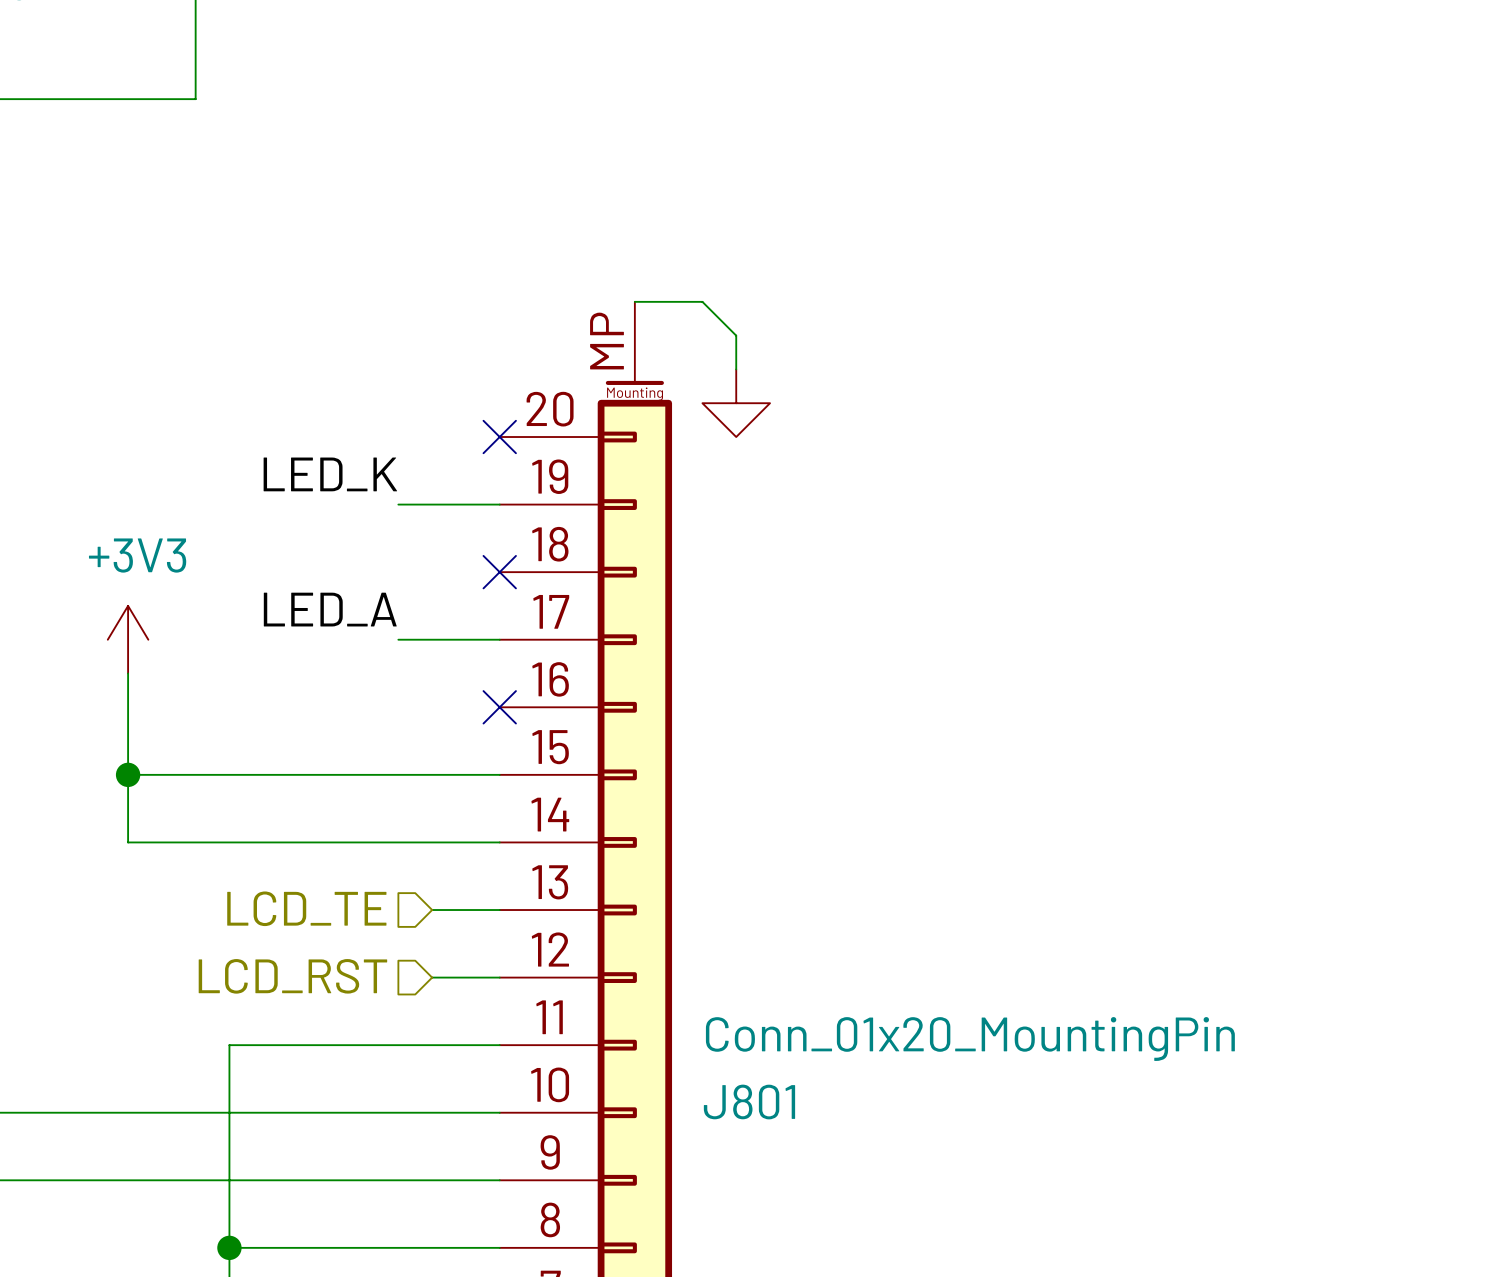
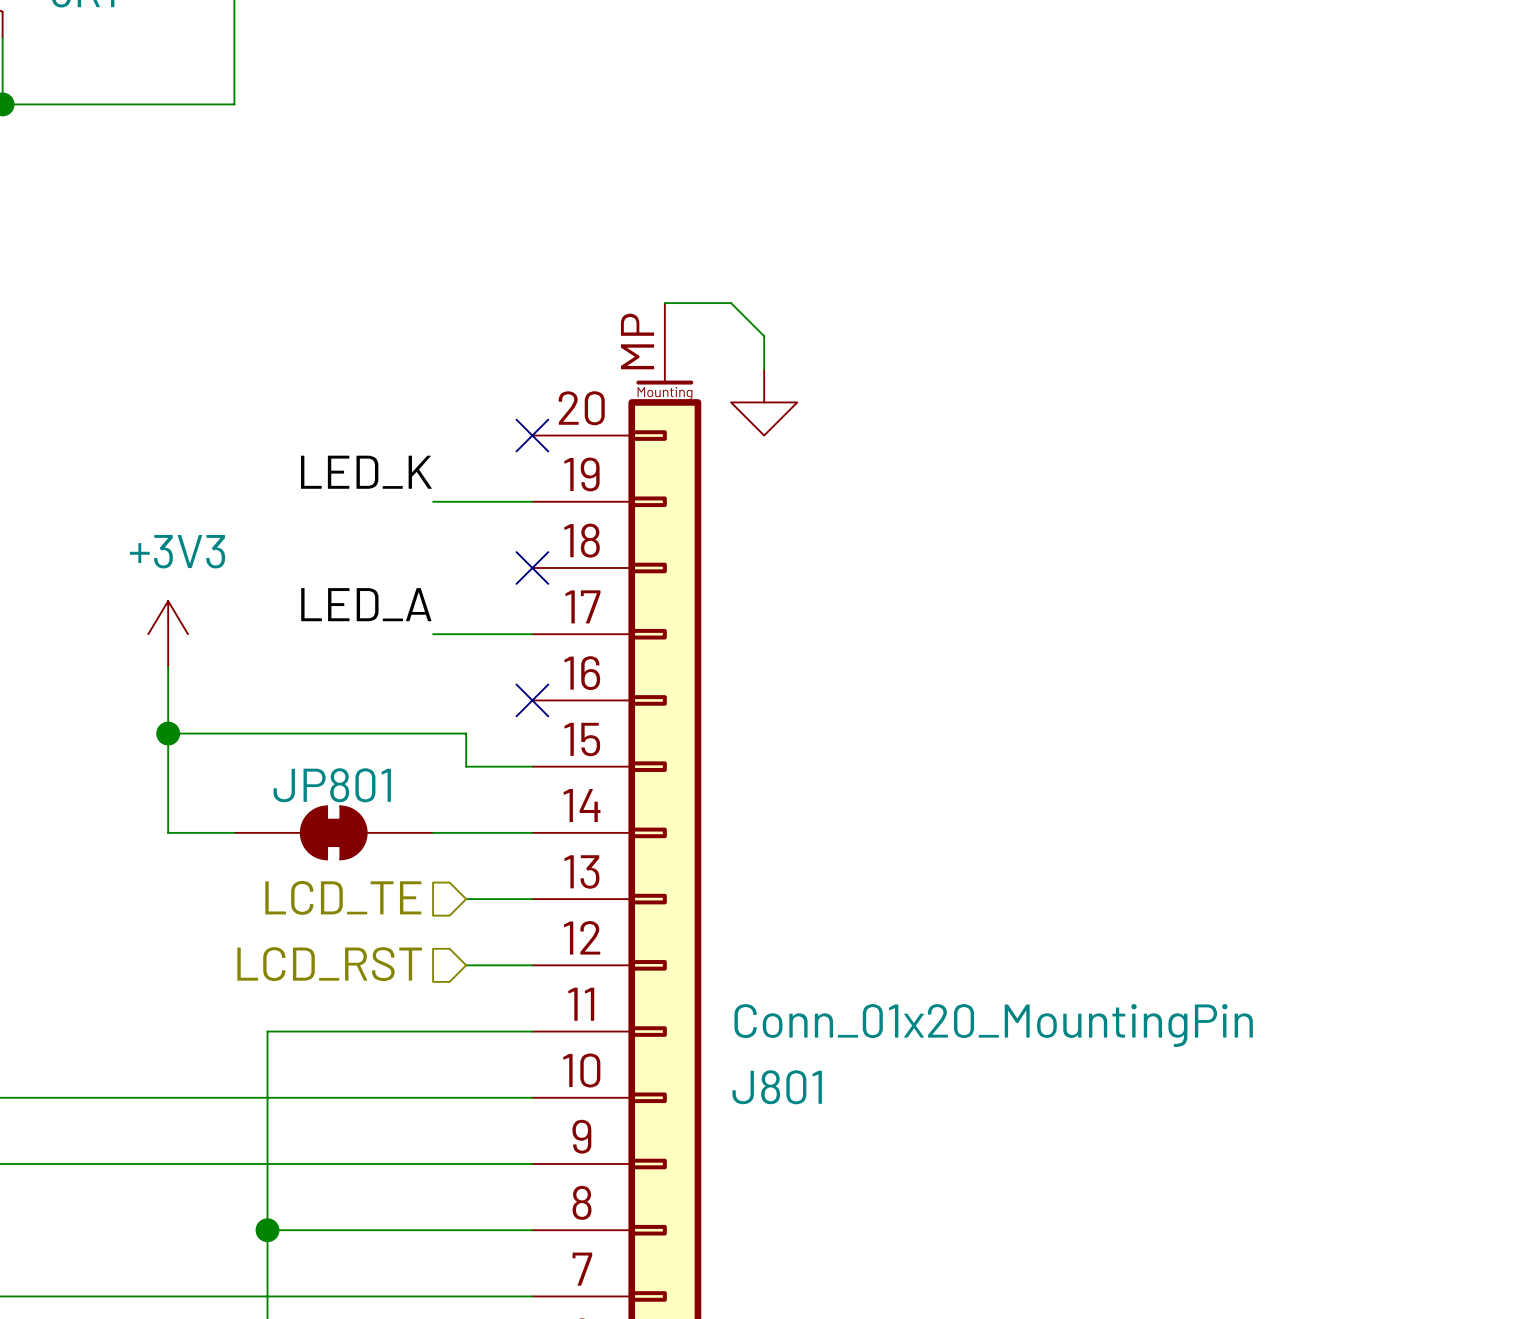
wire: (128, 774) (432, 774) -> (168, 733) (466, 733) (466, 766)
junction position: (128, 774) -> (168, 733)
JP801: none -> (333, 832)

